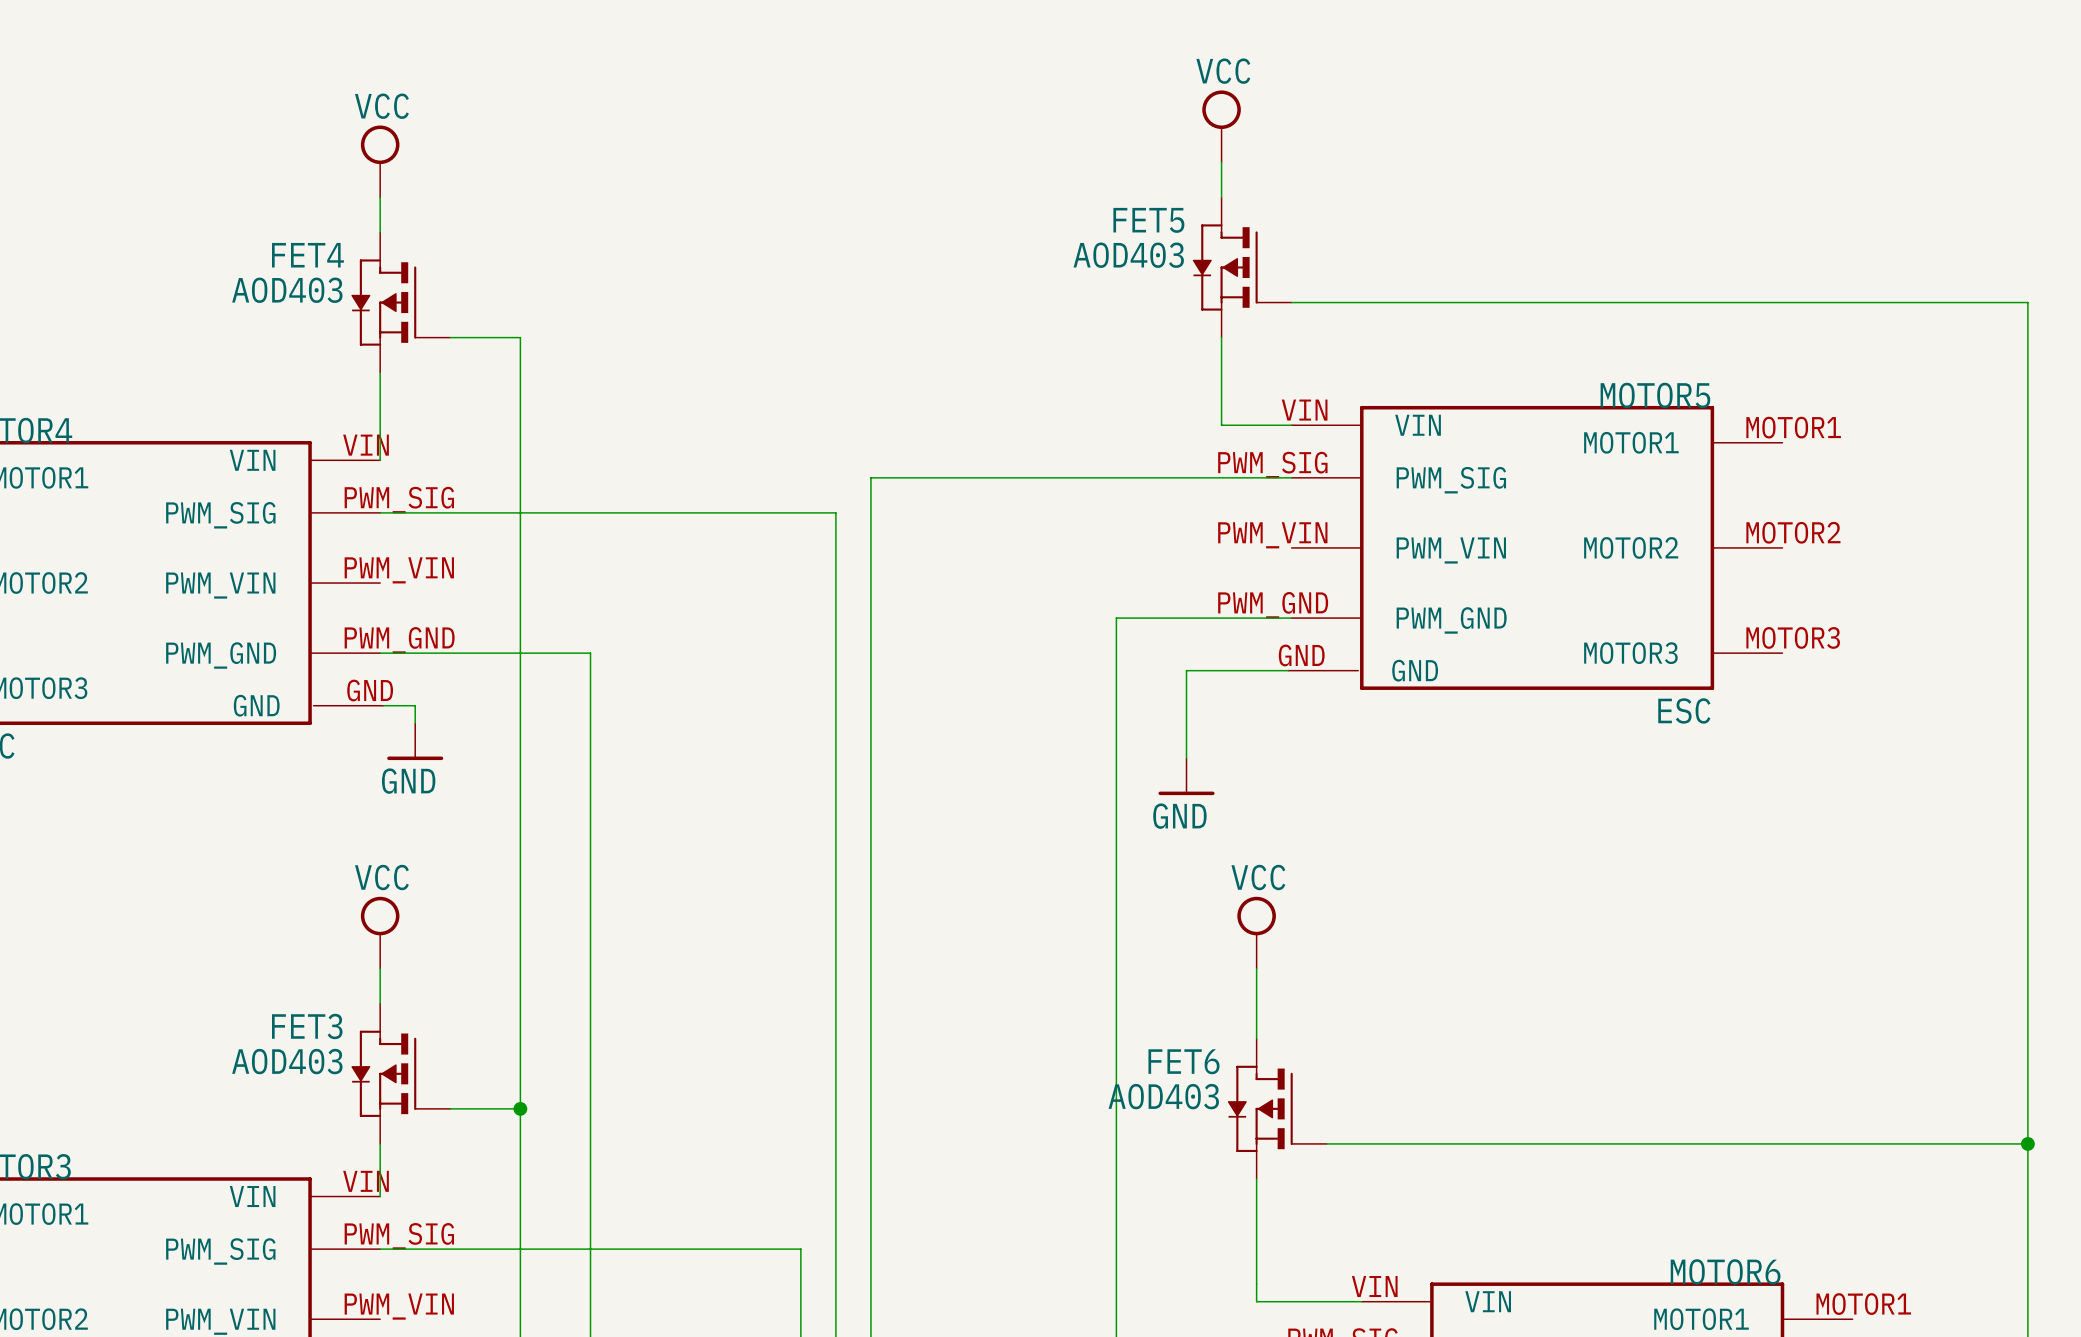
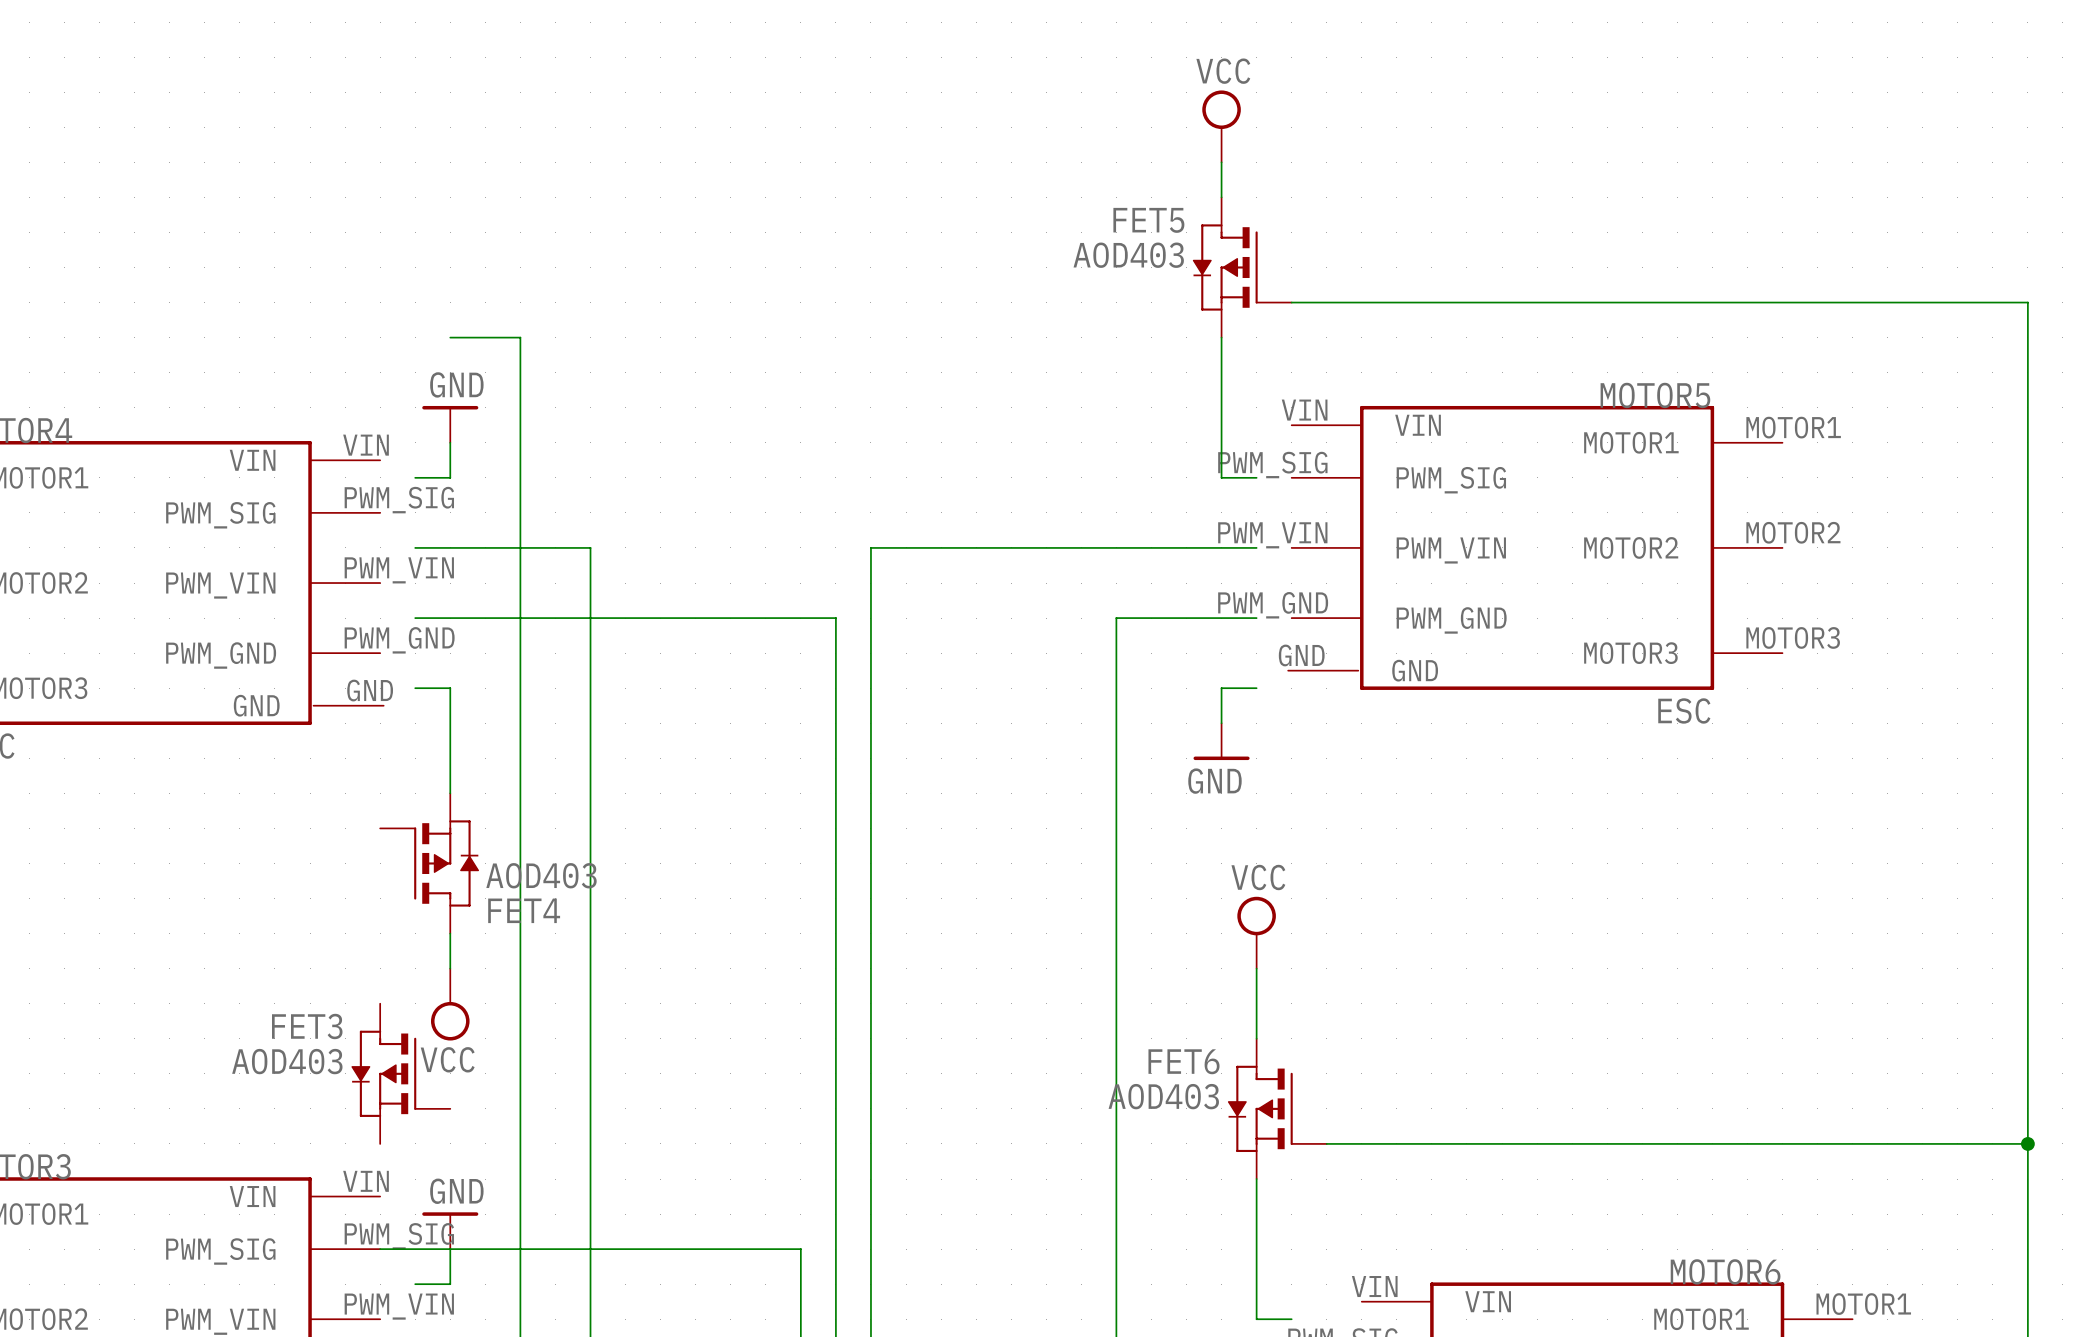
power symbol: VCC (380, 161) -> none
wire: (380, 197) (380, 232) -> none
FET4 rotation: 0° (383, 302) -> 180° (446, 863)
FET4 position: (400, 302) -> (429, 863)
wire: (380, 372) (380, 460) -> none
power symbol: none -> GND (450, 424)
wire: (1221, 425) (1291, 425) -> (1221, 425) (1221, 477)
wire: none -> (450, 442) (450, 477) (415, 477)
wire: (1221, 477) (870, 477) (870, 547) -> (1256, 547) (870, 547)
wire: (1256, 477) (1291, 477) -> none
wire: (380, 512) (835, 512) (835, 618) -> (415, 618) (835, 618)
wire: (1256, 618) (1291, 618) -> none
wire: (380, 653) (590, 653) -> (415, 547) (590, 547) (590, 653)
wire: (1288, 670) (1186, 670) (1186, 758) -> none
wire: none -> (415, 688) (450, 688) (450, 793)
wire: none -> (1256, 688) (1221, 688) (1221, 723)
wire: (383, 705) (415, 705) (415, 723) -> none
power symbol: GND (415, 741) -> none
power symbol position: GND (1186, 776) -> GND (1221, 741)
power symbol rotation: 0° (380, 916) -> 180° (450, 1021)
power symbol position: VCC (380, 932) -> VCC (450, 1004)
wire: (380, 968) (380, 1003) -> (450, 933) (450, 968)
wire: (450, 1108) (520, 1108) -> none
junction: (520, 1108) -> none
wire: (380, 1143) (380, 1196) -> none
power symbol: none -> GND (450, 1230)
wire: none -> (450, 1249) (450, 1284) (415, 1284)
wire: (1256, 1301) (1361, 1301) -> (1256, 1301) (1256, 1319) (1291, 1319)

